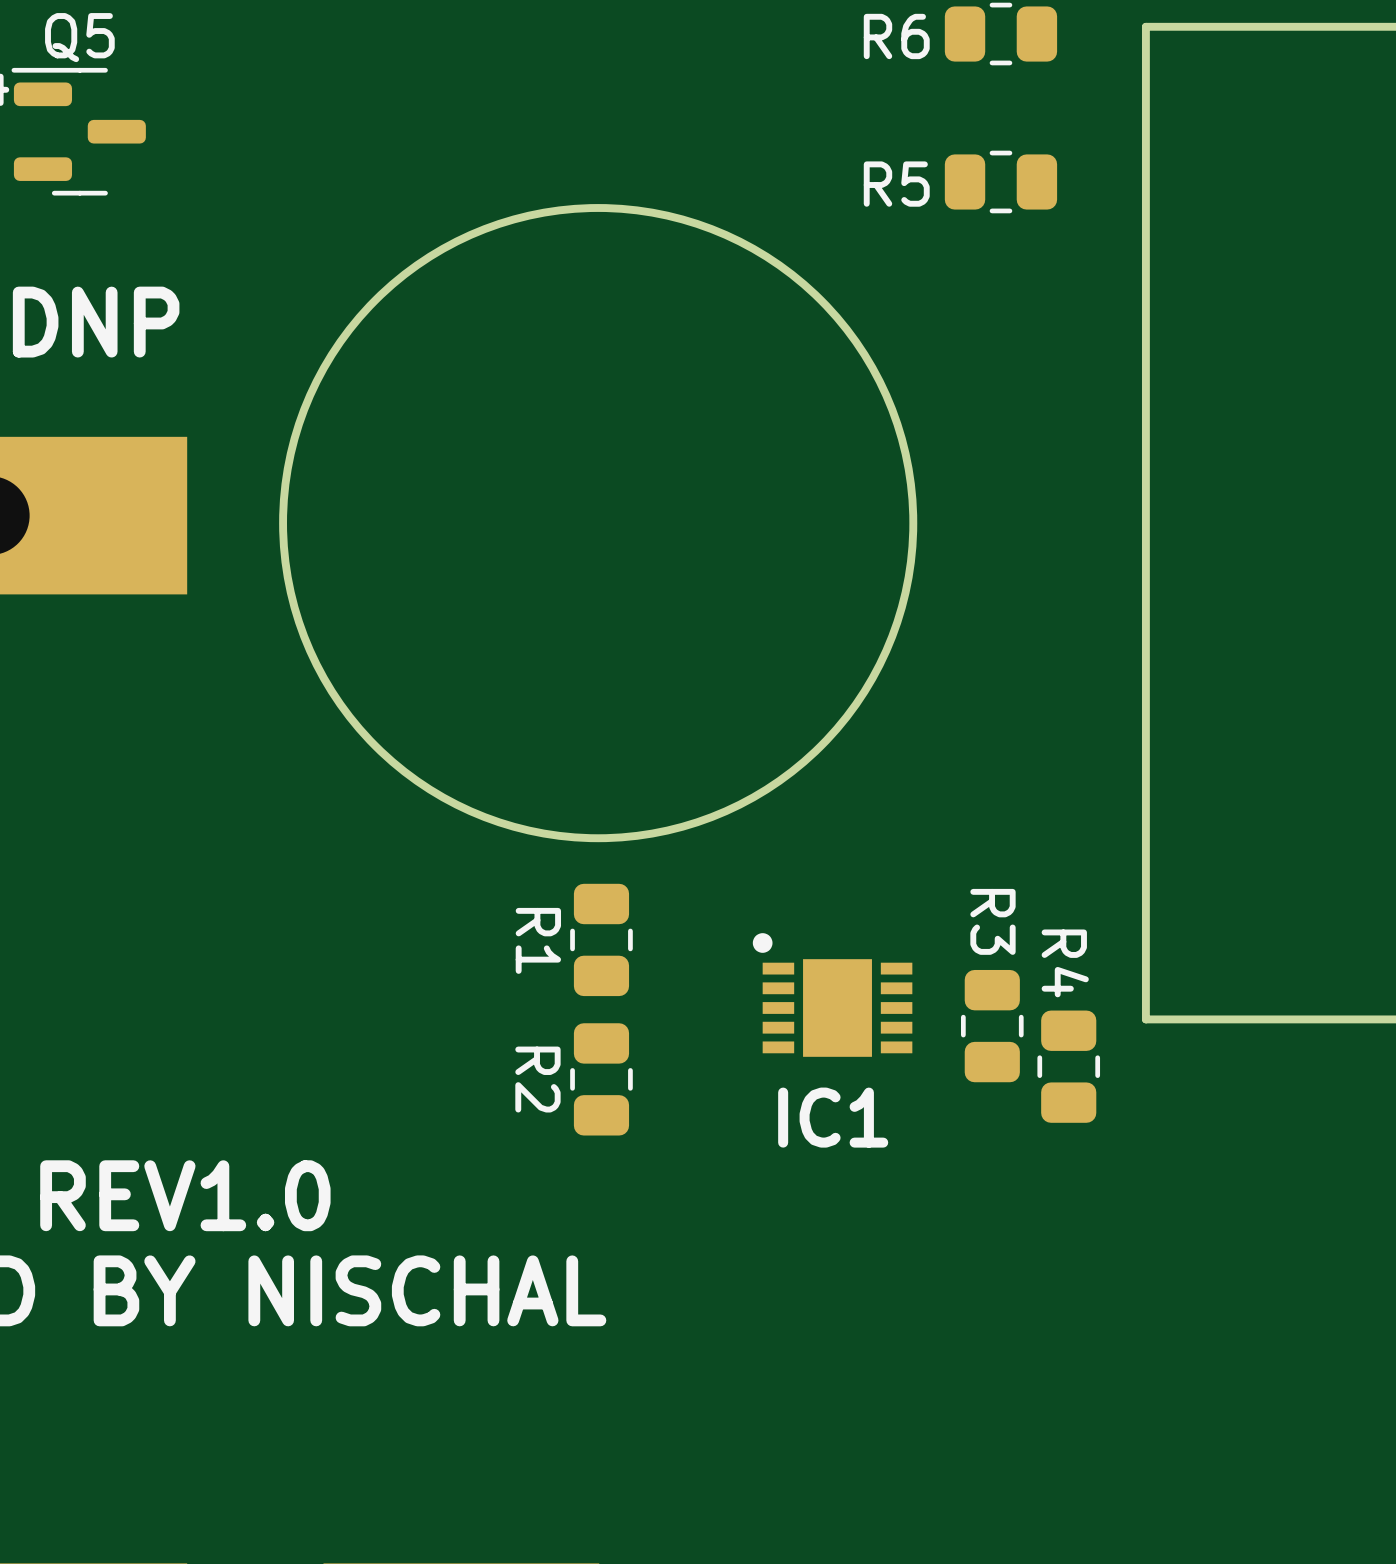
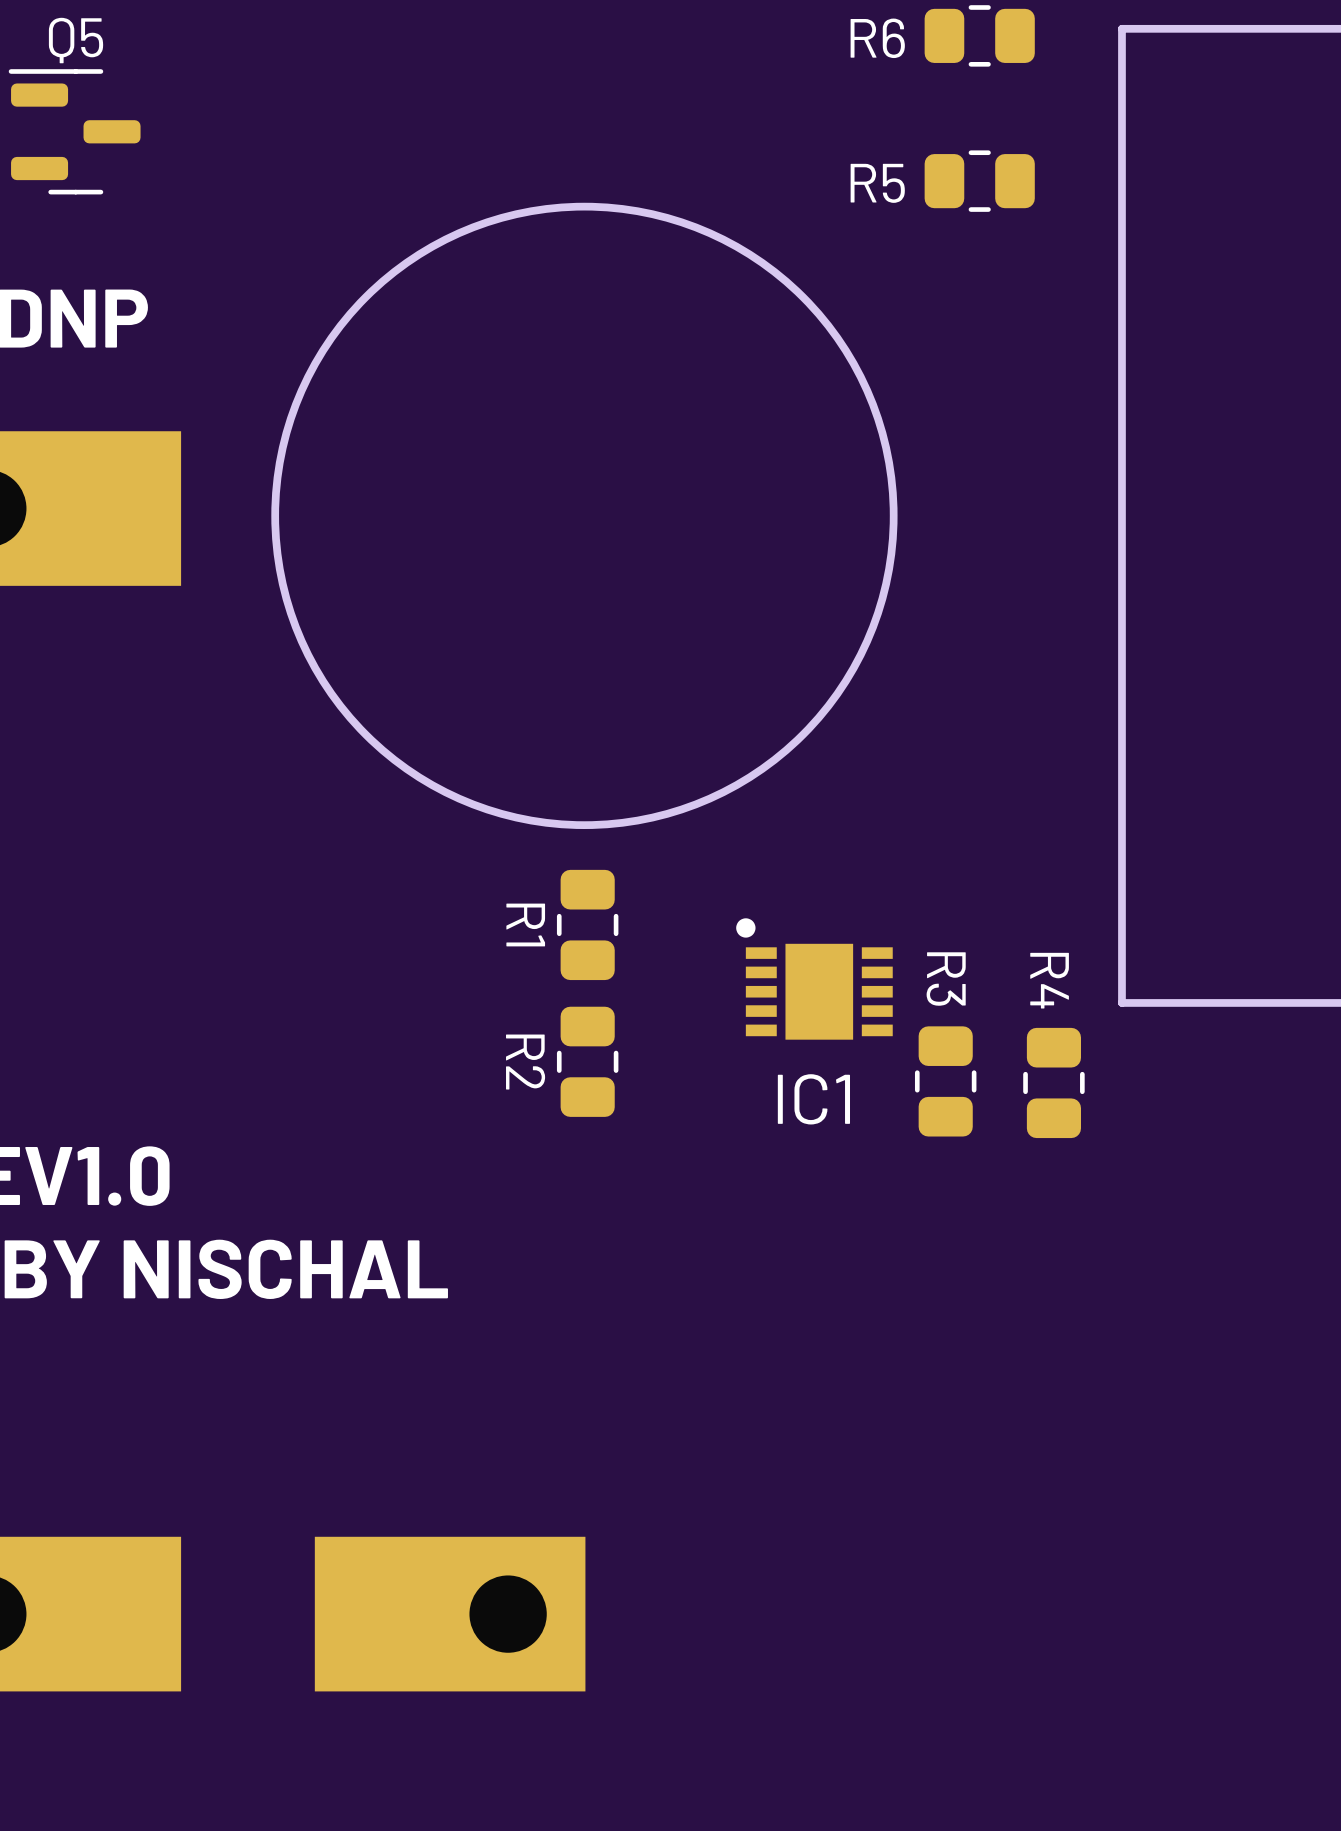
R3 position: (992, 1026) -> (945, 1081)
R4 position: (1068, 1066) -> (1053, 1082)

